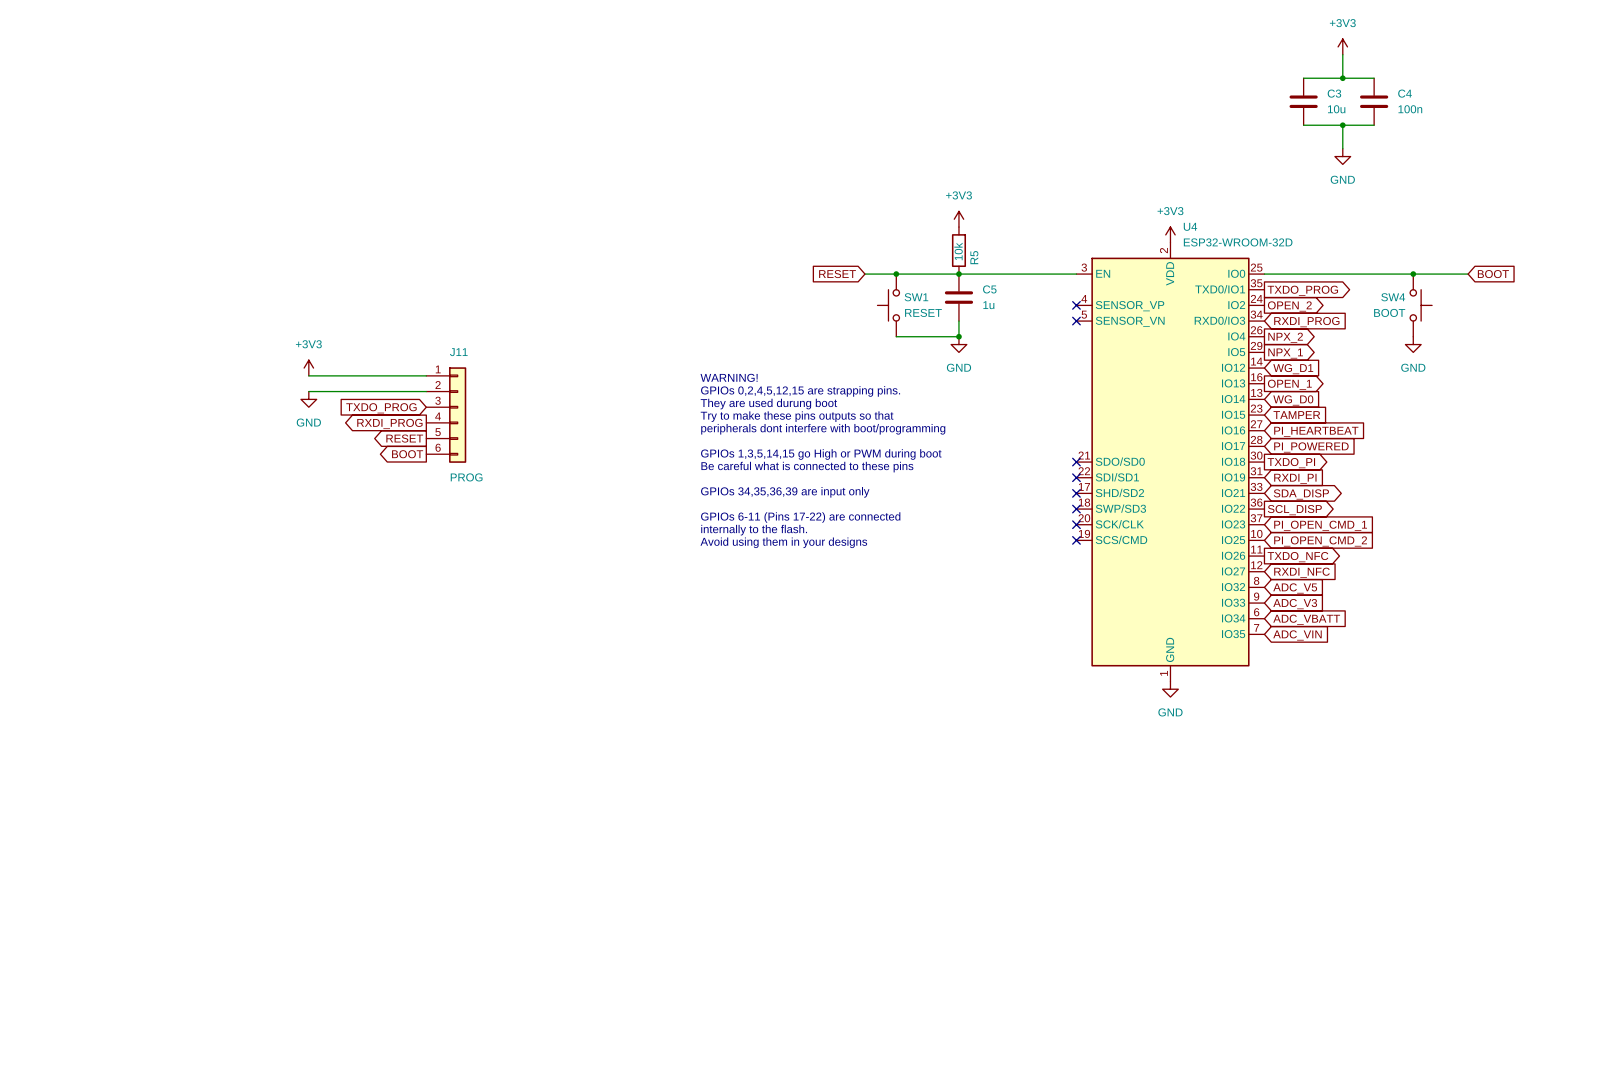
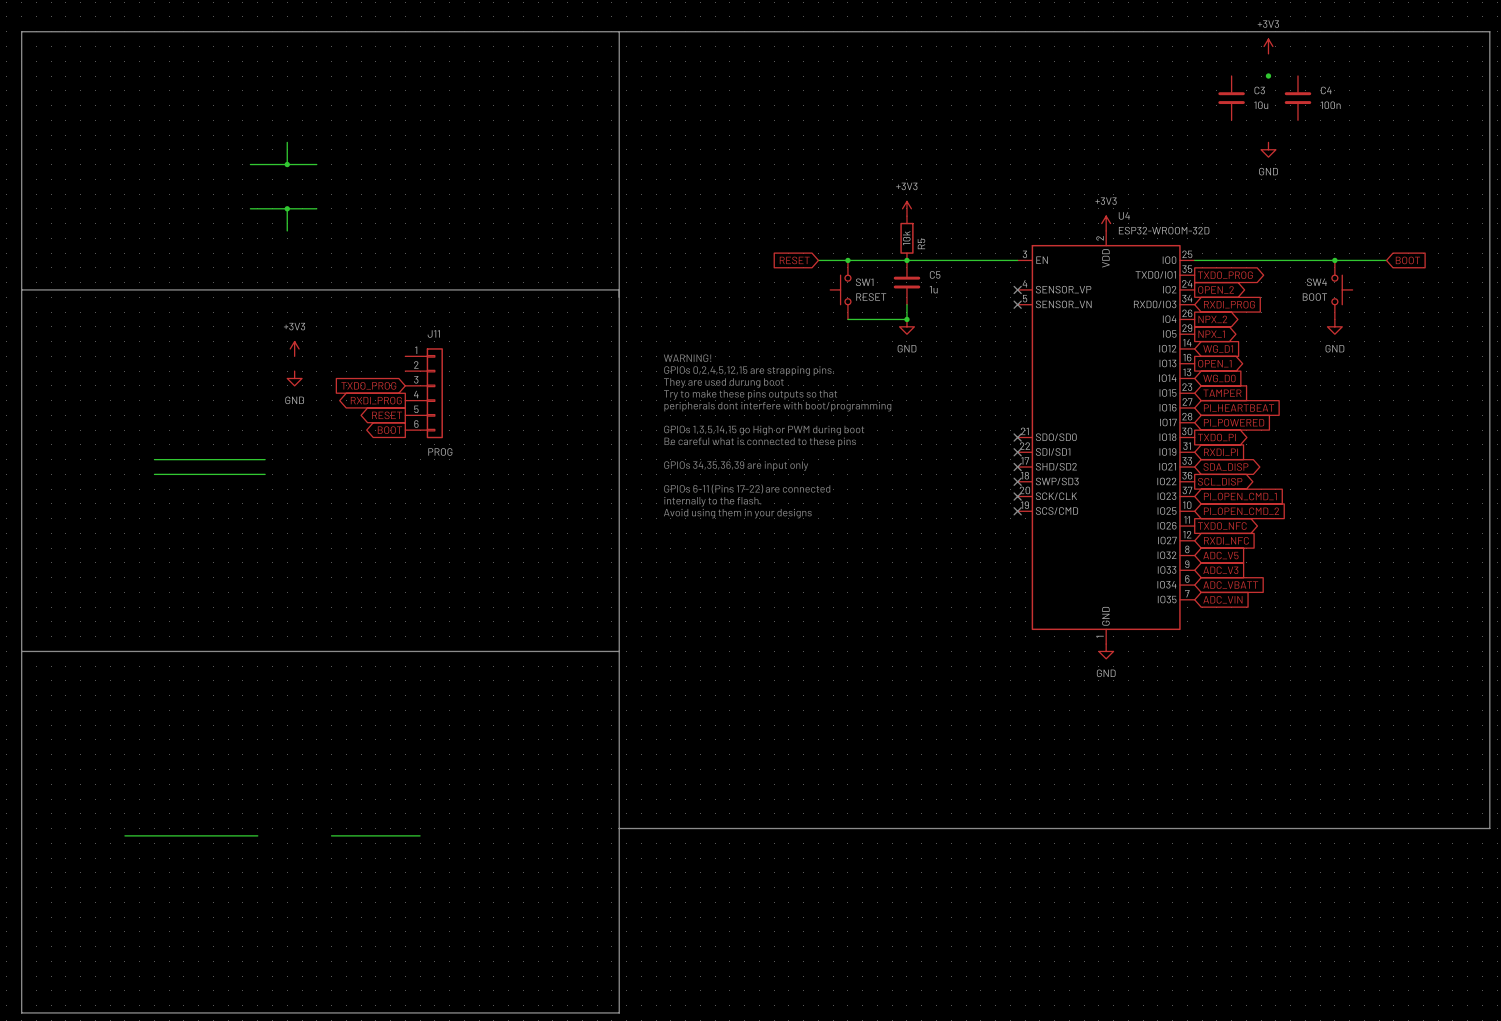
line: none -> (619, 31) (619, 1012) (21, 1012) (21, 31) (1489, 31) (1489, 828) (619, 828)
wire: (1342, 54) (1342, 78) -> none
wire: (1303, 78) (1374, 78) -> none
wire: (1303, 125) (1374, 125) -> none
wire: (1342, 125) (1342, 148) -> none
junction: (1342, 125) -> none
wire: none -> (287, 142) (287, 164)
wire: none -> (250, 164) (316, 164)
junction: none -> (287, 164)
wire: none -> (250, 208) (316, 208)
wire: none -> (287, 208) (287, 230)
junction: none -> (287, 208)
line: none -> (21, 289) (619, 289)
wire: (308, 375) (426, 375) -> none
wire: (308, 391) (426, 391) -> none
wire: none -> (154, 459) (265, 459)
wire: none -> (154, 474) (265, 474)
line: none -> (21, 651) (619, 651)
wire: none -> (124, 835) (257, 835)
wire: none -> (331, 835) (420, 835)

